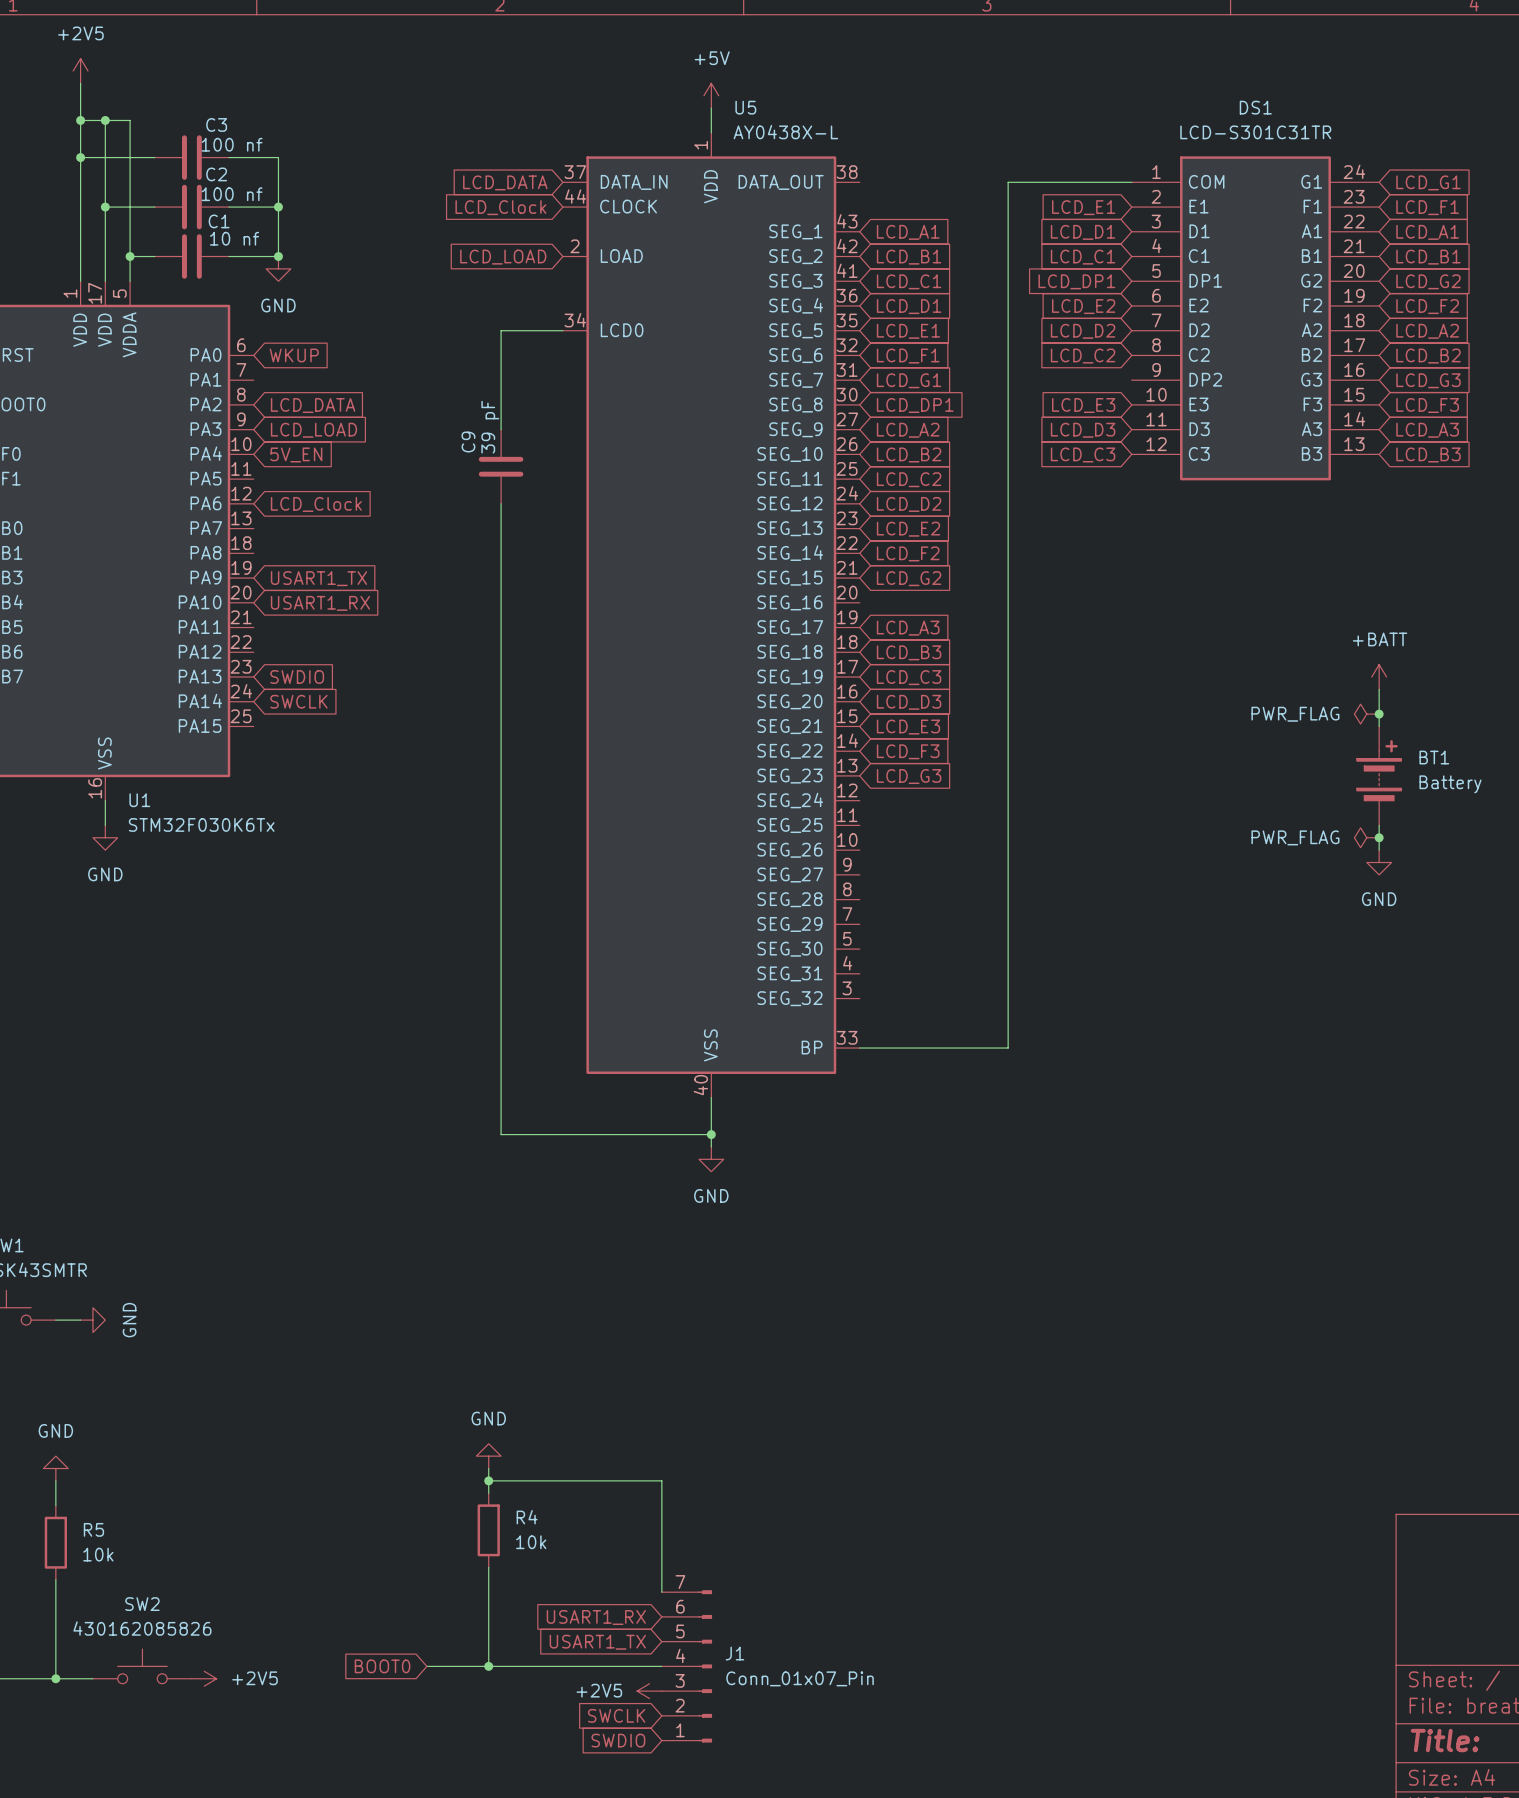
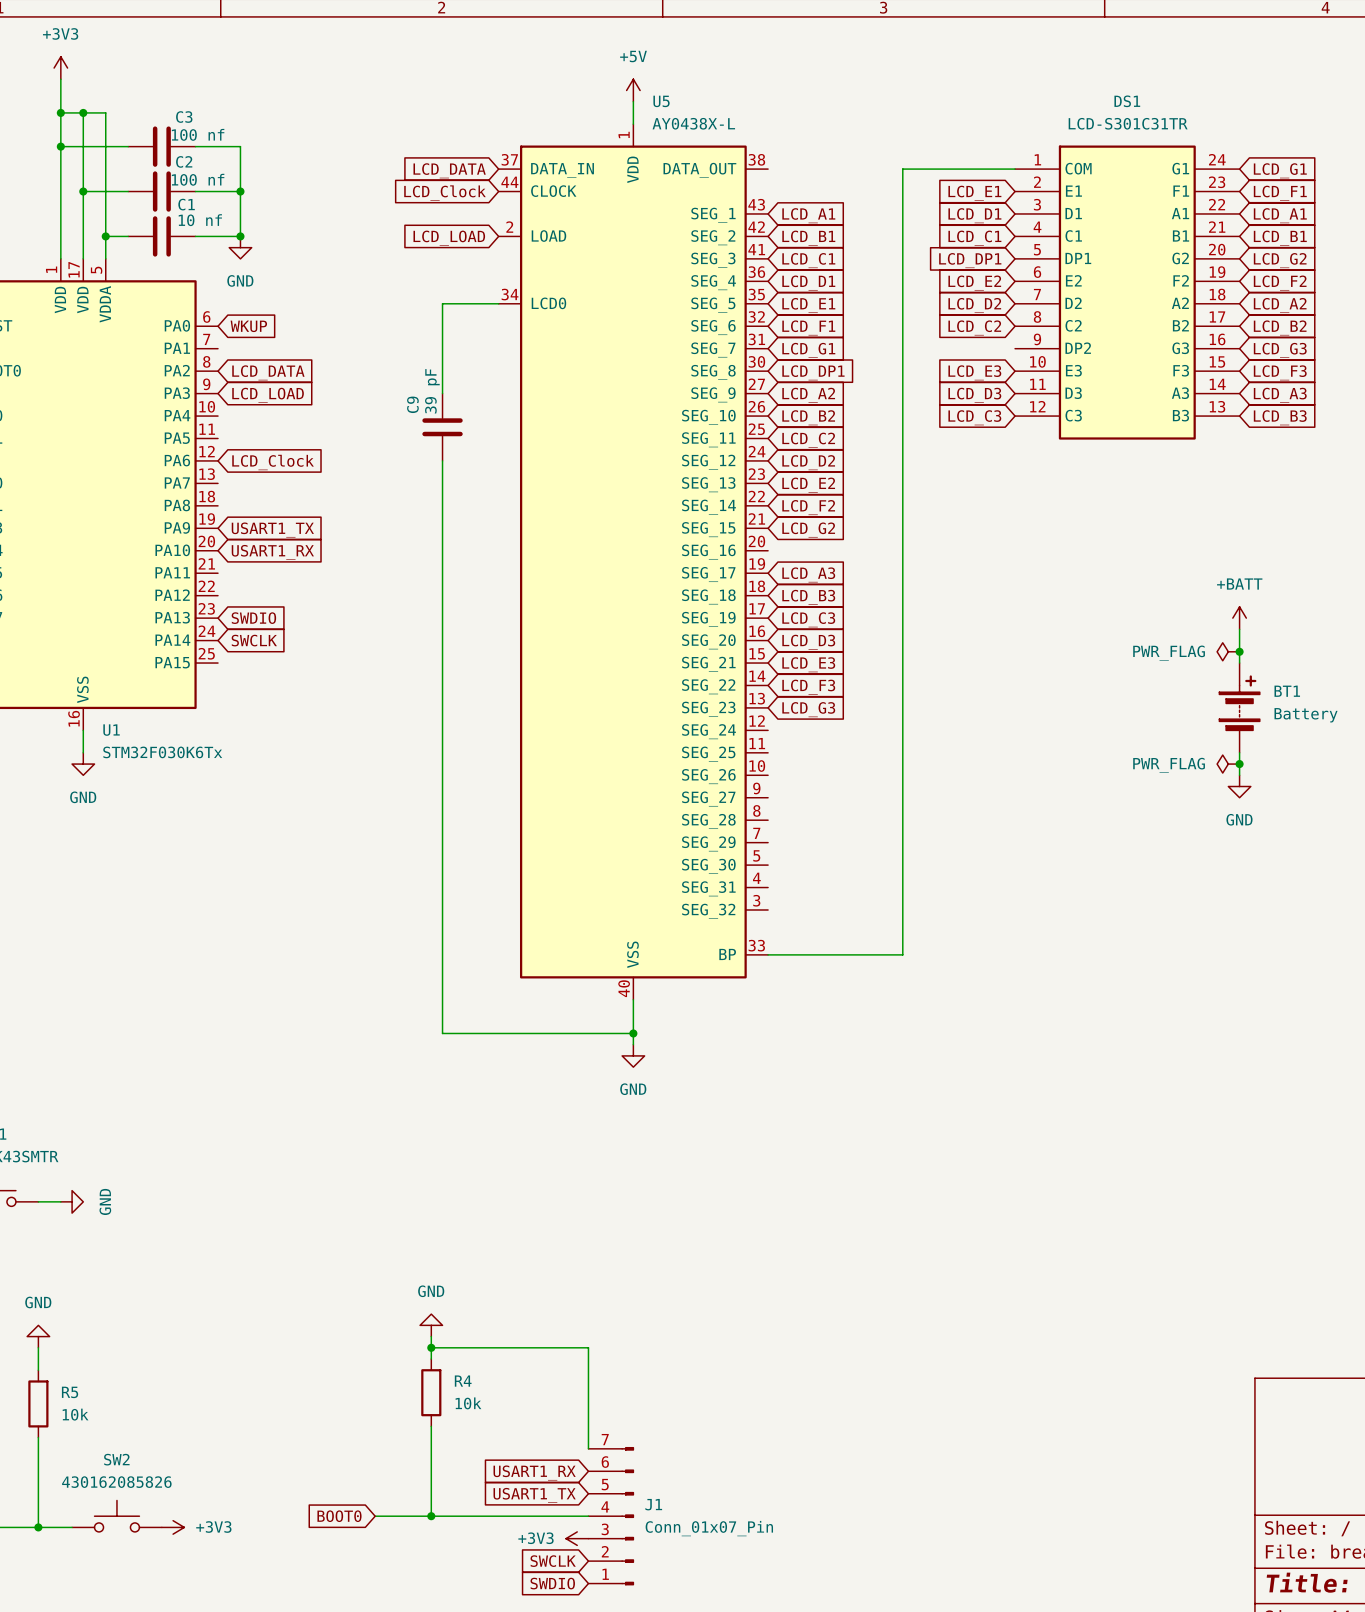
power symbol: +2V5 (80, 71) -> +3V3 (60, 68)
global label: 5V_EN (296, 454) -> none
power symbol: +2V5 (204, 1678) -> +3V3 (173, 1527)
power symbol: +2V5 (649, 1691) -> +3V3 (577, 1538)

